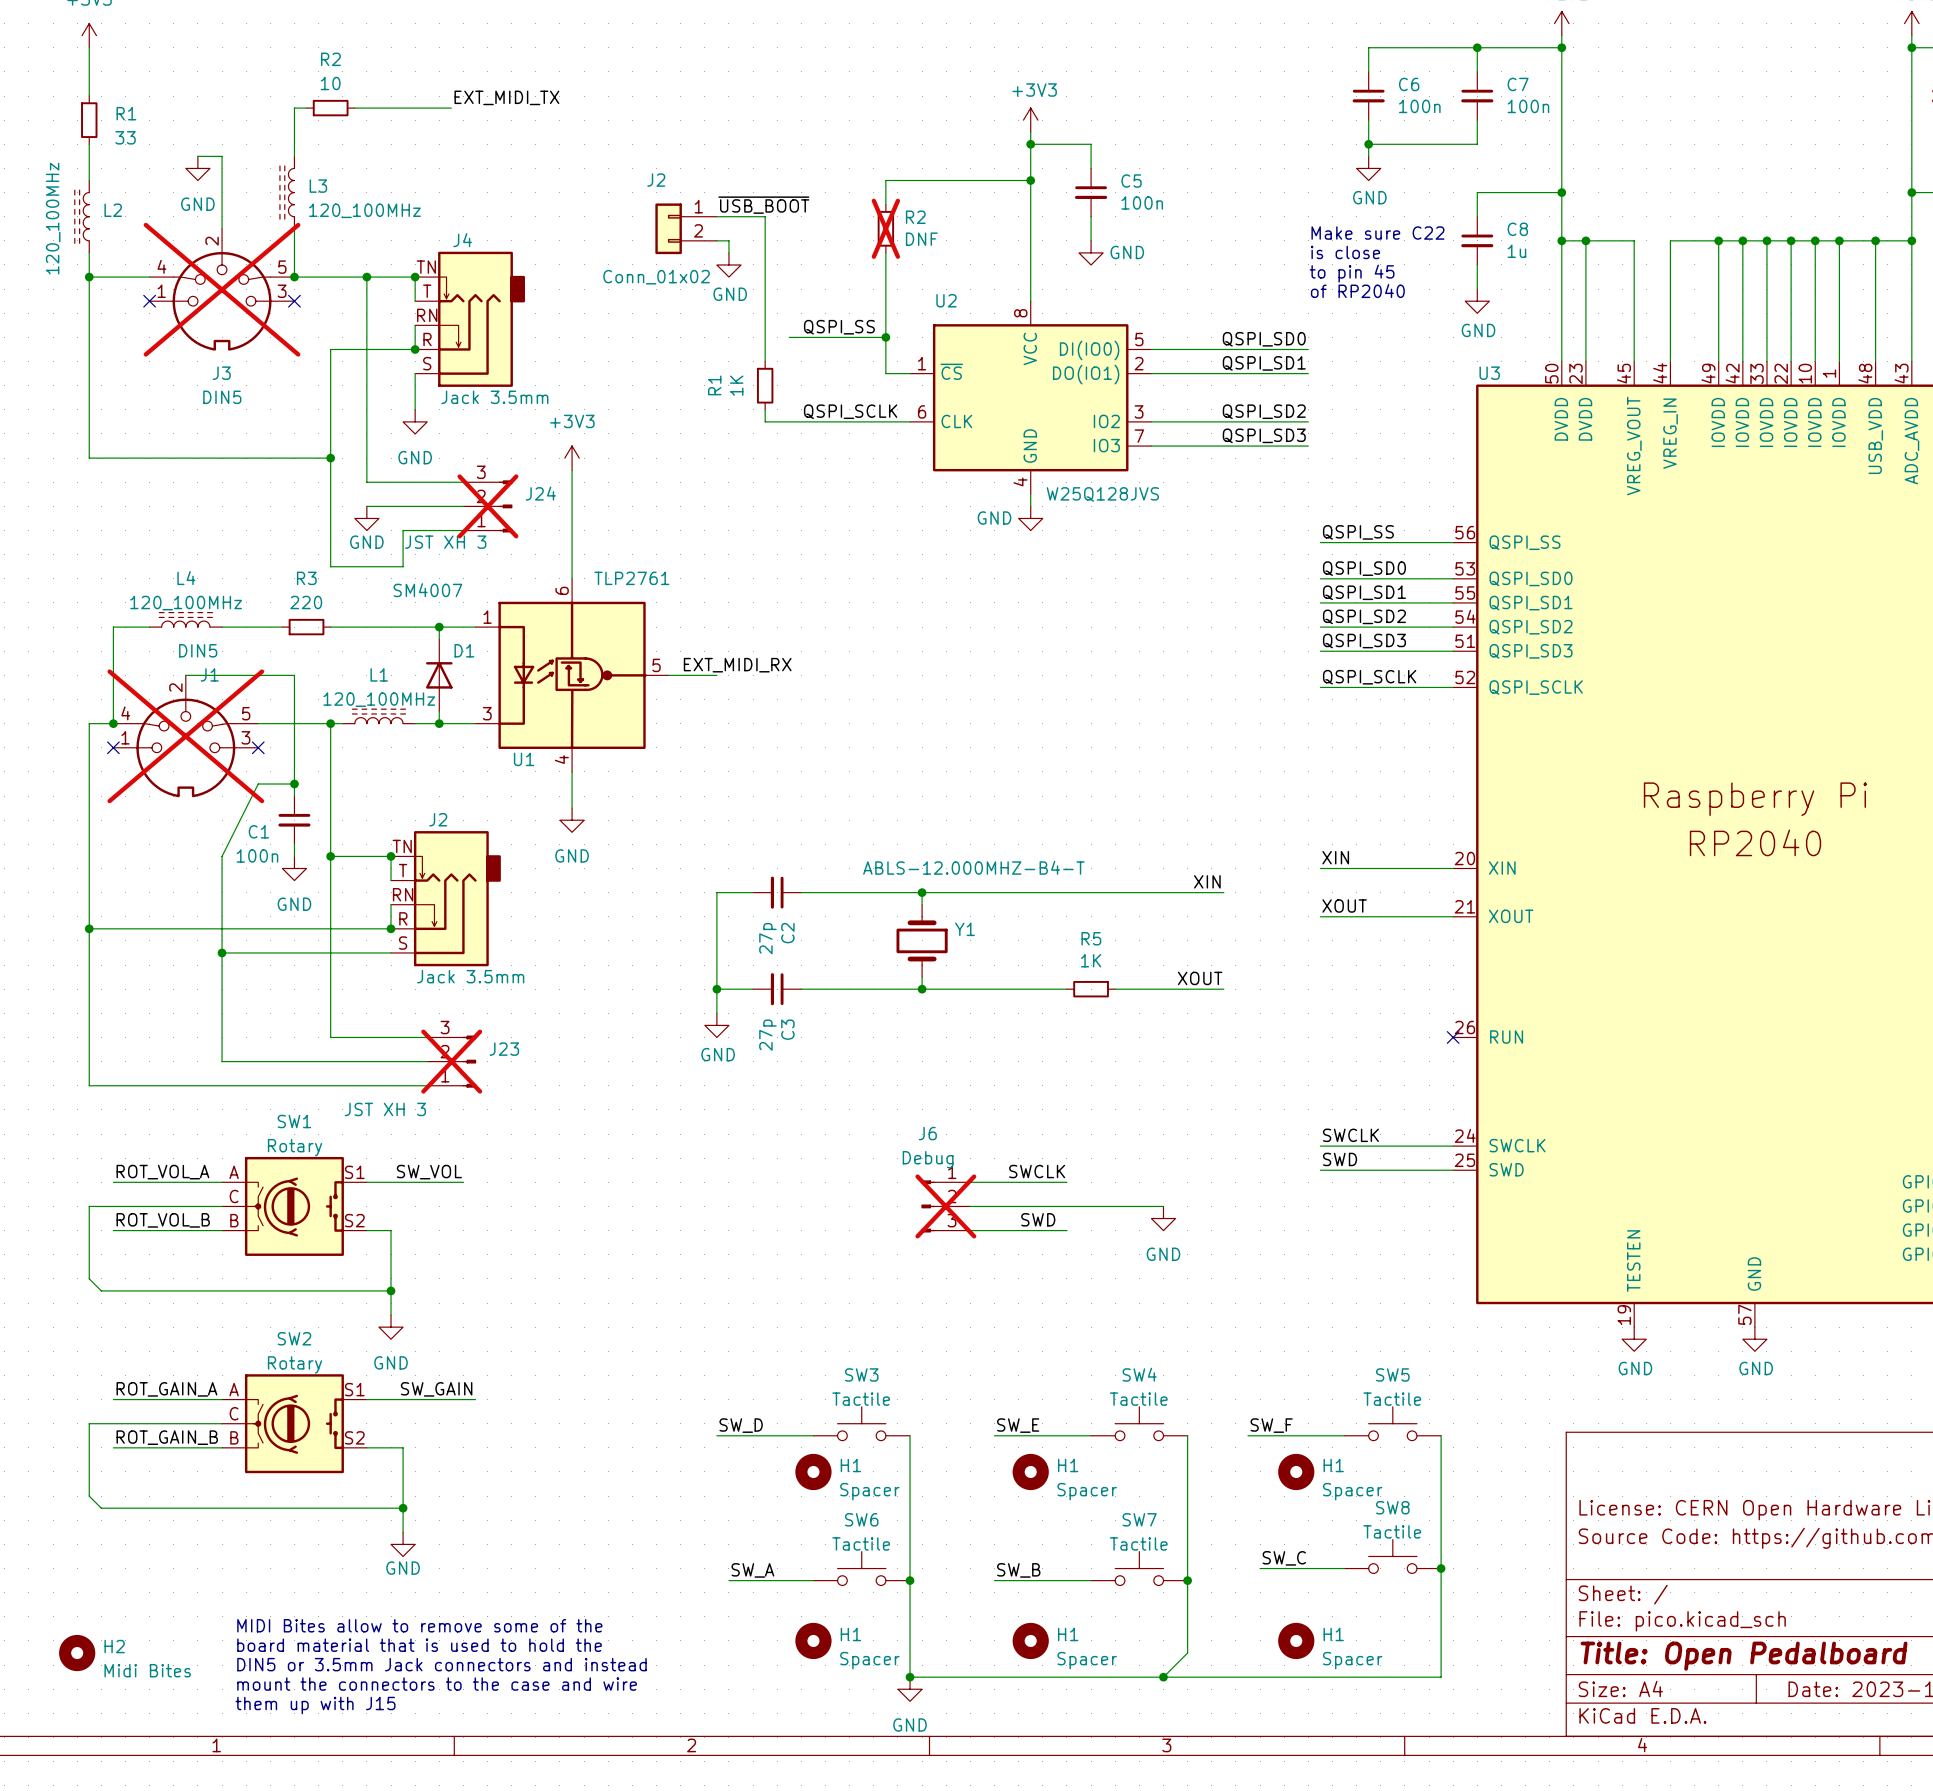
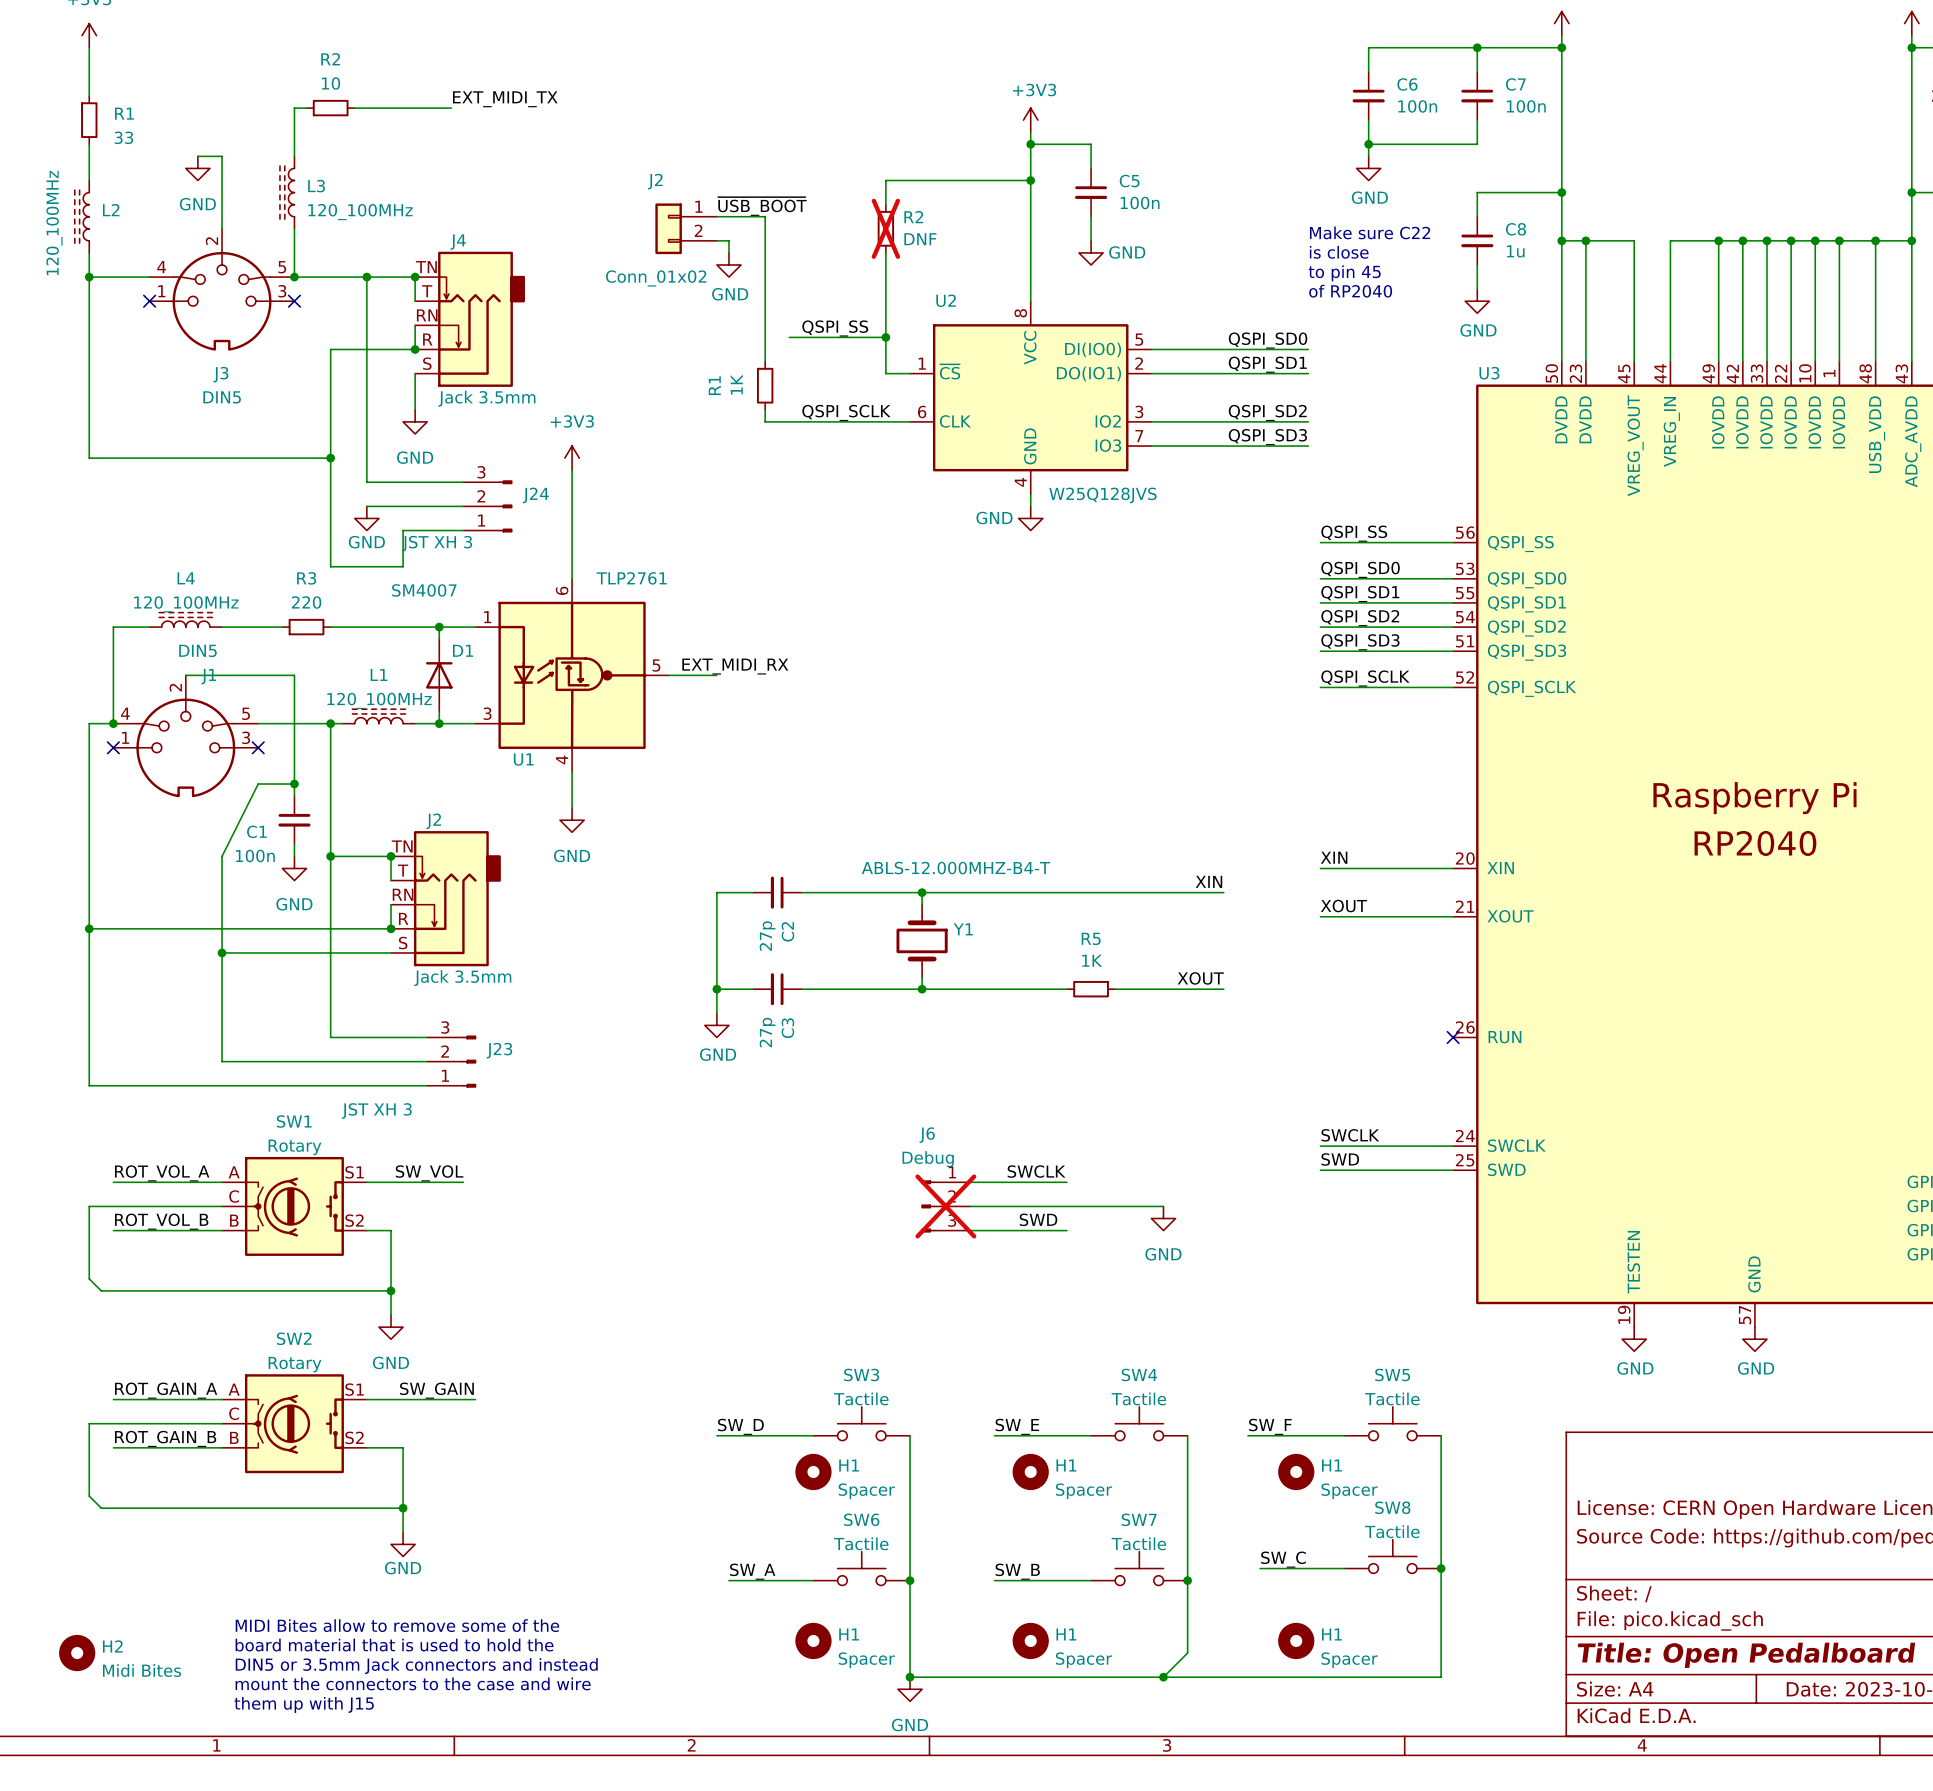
J3 do-not-place cross: (222, 289) -> none
J24 do-not-place cross: (487, 506) -> none
J1 do-not-place cross: (185, 736) -> none
J23 do-not-place cross: (451, 1061) -> none

